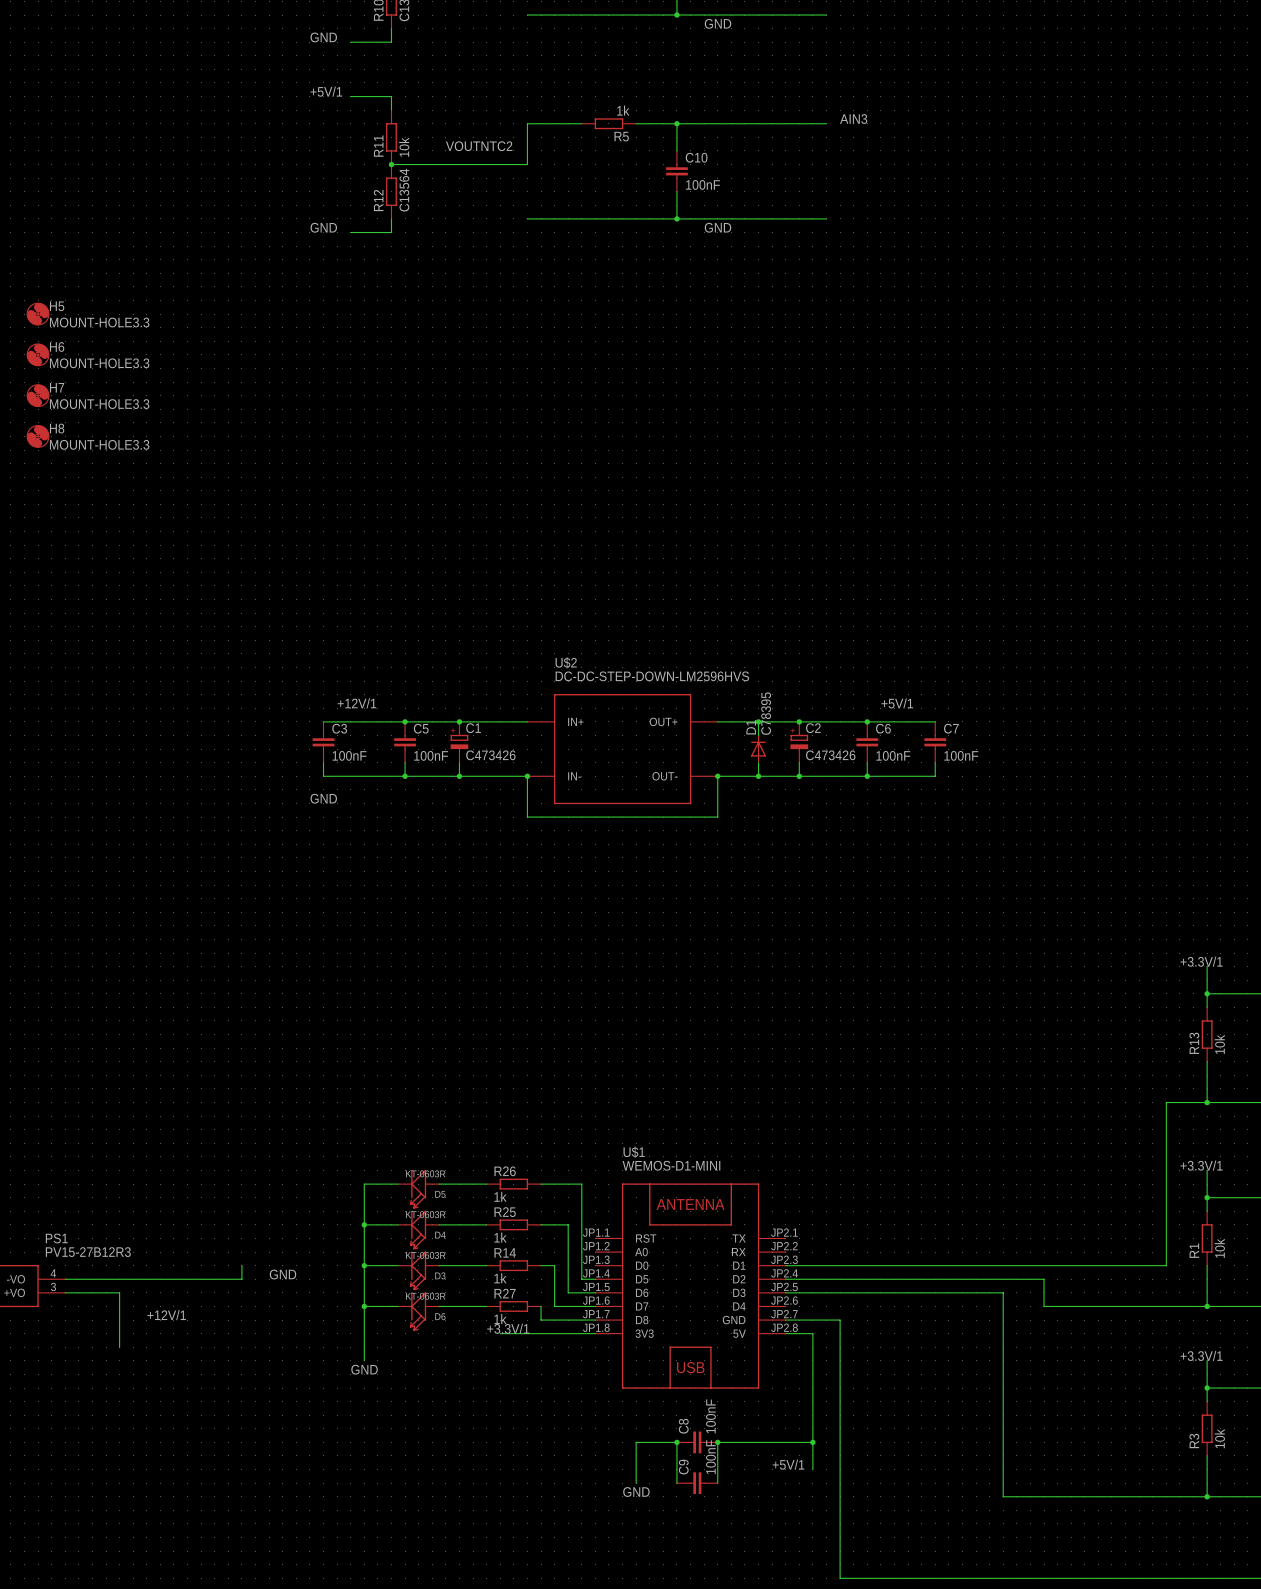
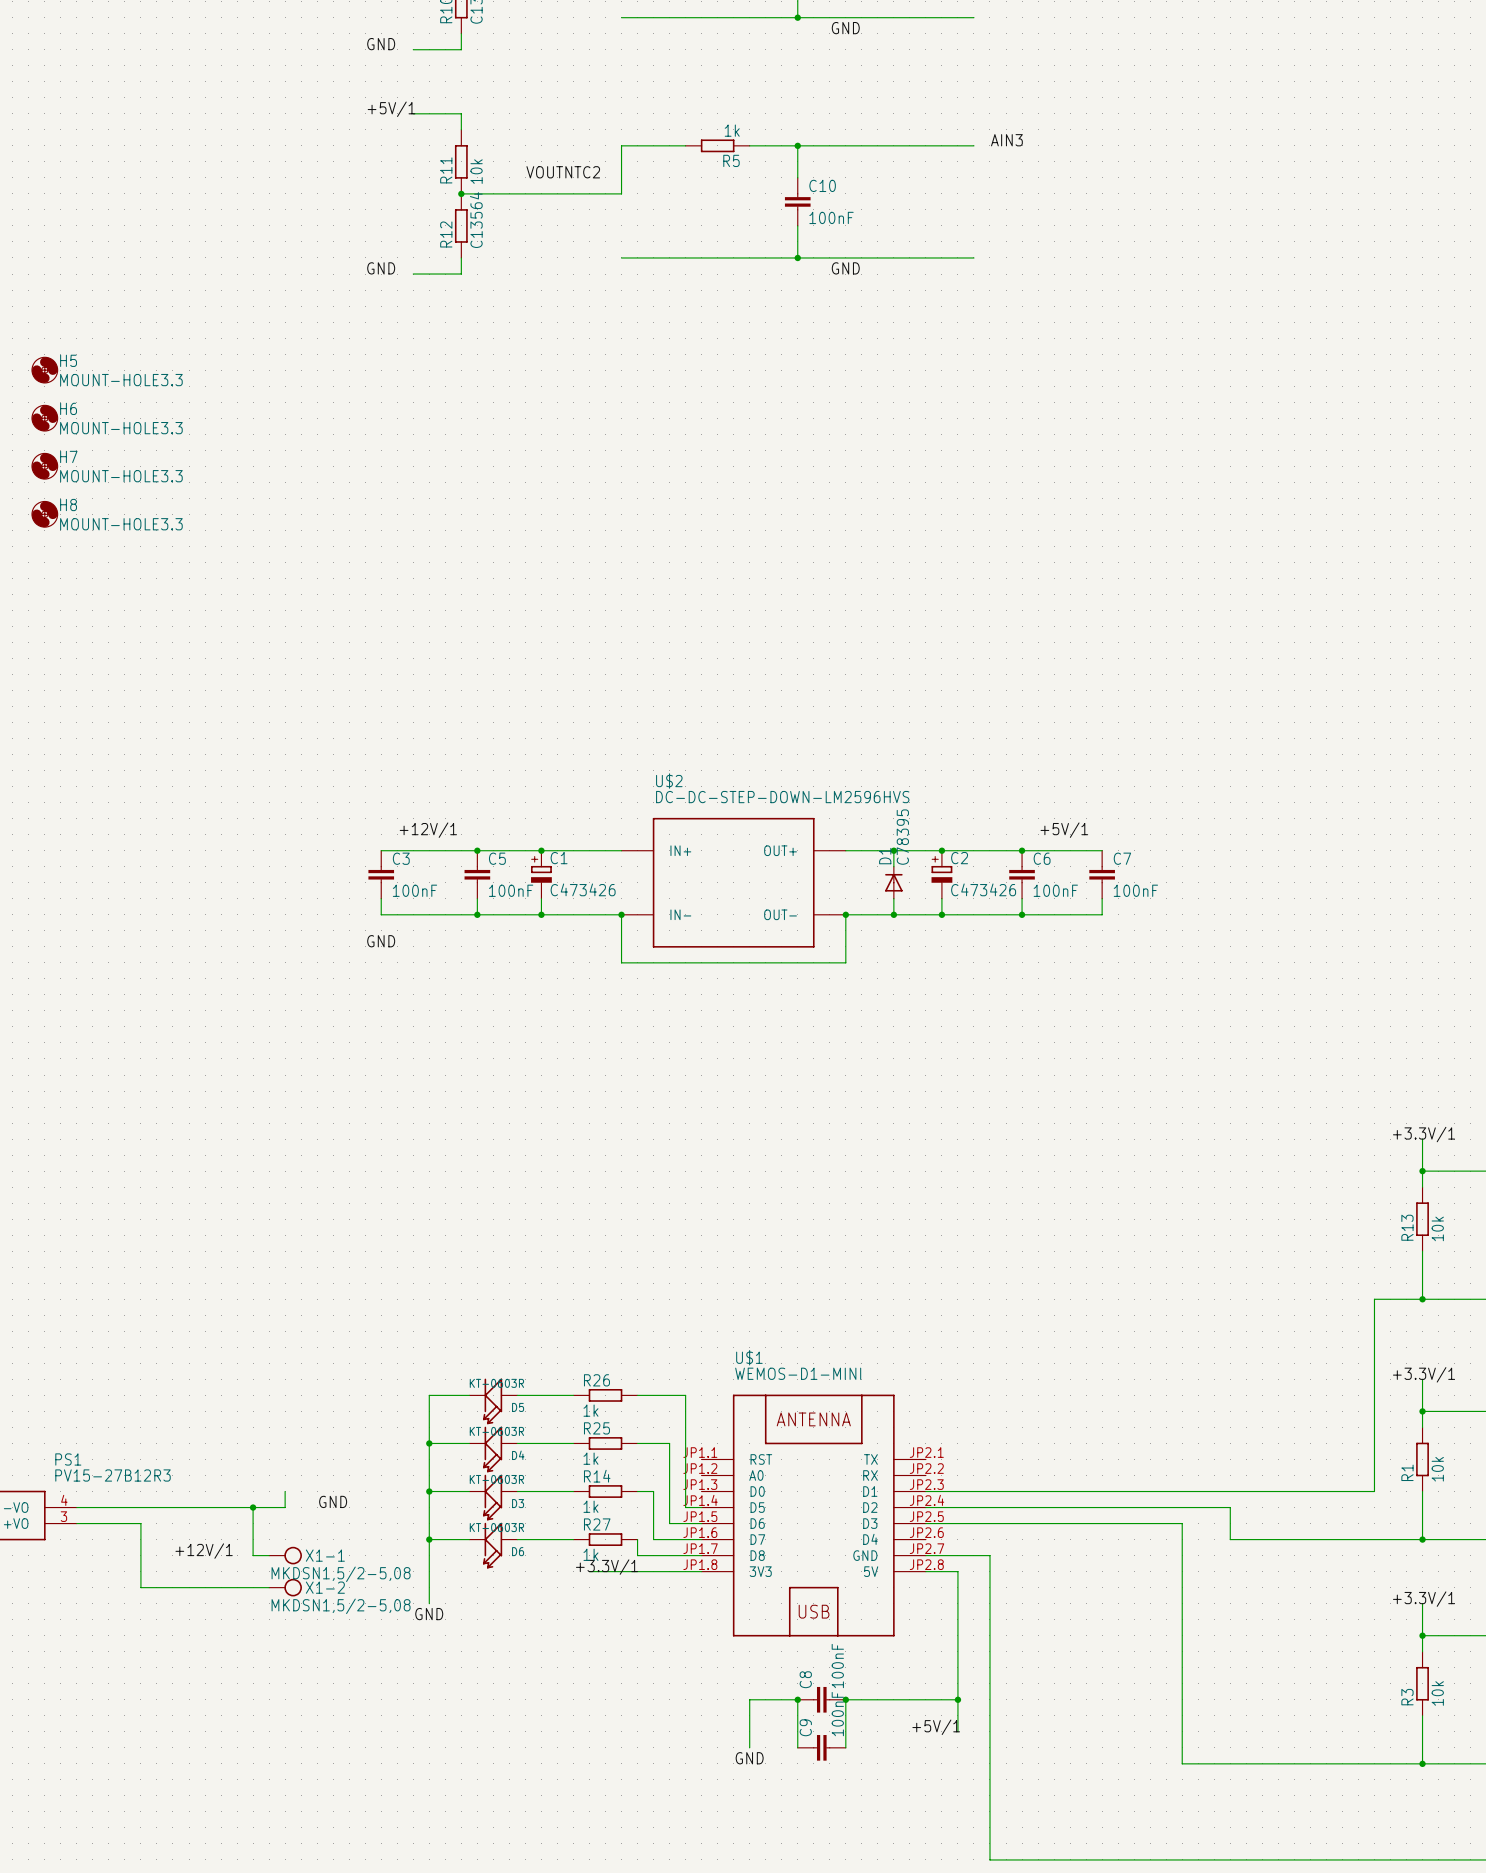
wire: none -> (253, 1507) (253, 1555) (269, 1555)
junction: none -> (253, 1507)
X1-1: none -> MKDSN1,5/2-5,08 (285, 1555)
wire: none -> (140, 1587) (269, 1587)
X1-2: none -> MKDSN1,5/2-5,08 (285, 1587)

